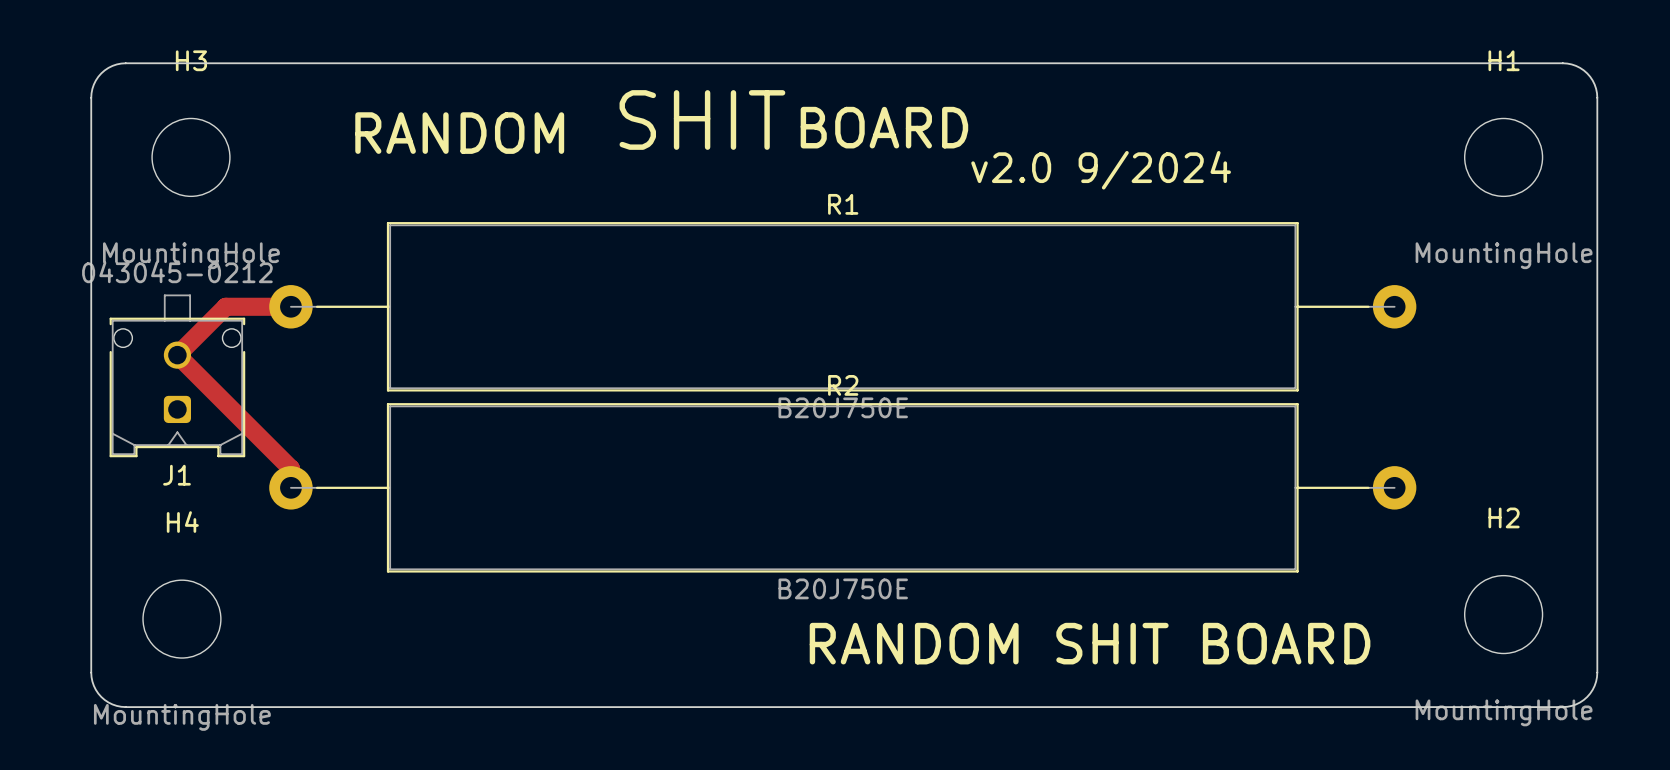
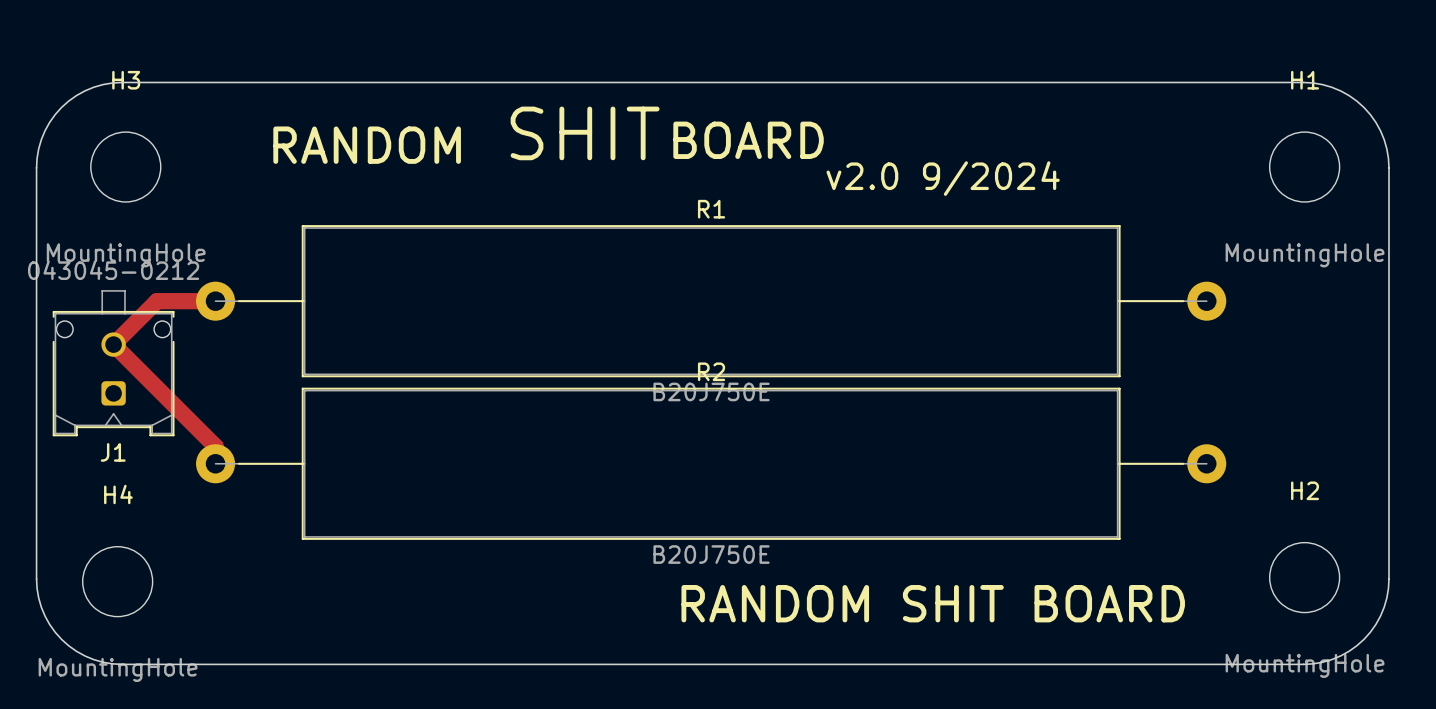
board edge: (186, 63) (116, 64) (108, 67) (98, 76) (91, 93) (91, 672) (93, 685) (101, 696) (108, 702) (121, 706) (1562, 707) (1576, 704) (1583, 699) (1592, 689) (1597, 672) (1597, 93) (1590, 76) (1583, 70) (1571, 64) (1502, 63) -> (121, 82) (93, 87) (76, 95) (61, 107) (49, 122) (41, 139) (36, 167) (36, 579) (38, 598) (49, 624) (68, 645) (93, 659) (121, 664) (1303, 664) (1322, 662) (1340, 655) (1356, 645) (1370, 632) (1380, 616) (1388, 588) (1388, 158) (1380, 130) (1363, 107) (1349, 95) (1331, 87) (1303, 82)

